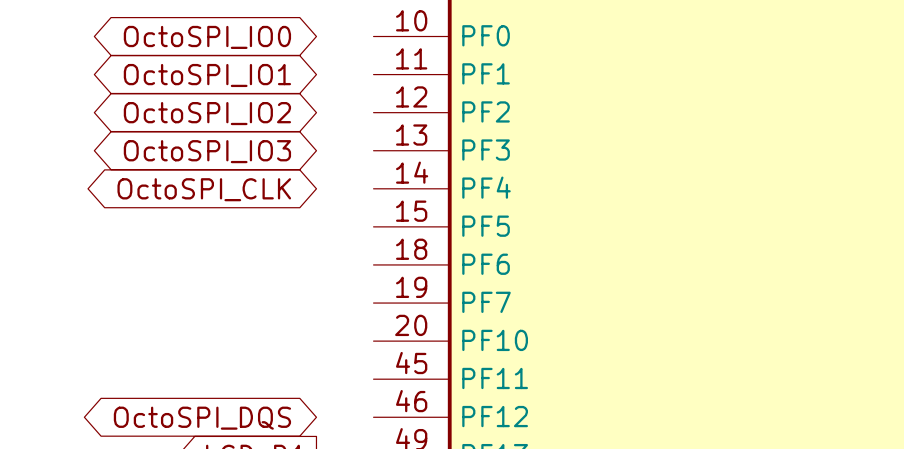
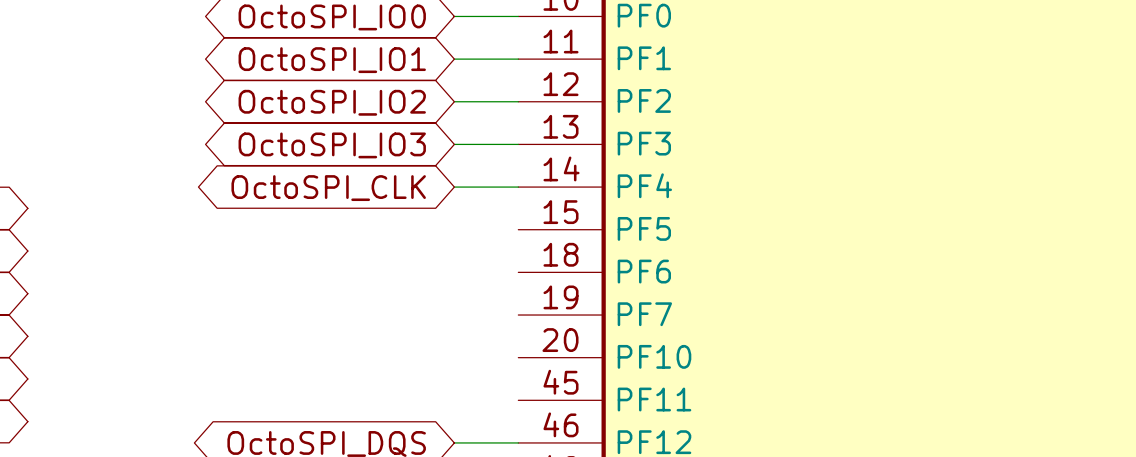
wire: none -> (454, 16) (518, 16)
wire: none -> (454, 59) (518, 59)
wire: none -> (454, 101) (518, 101)
wire: none -> (454, 144) (518, 144)
wire: none -> (454, 187) (518, 187)
wire: none -> (454, 442) (518, 442)

